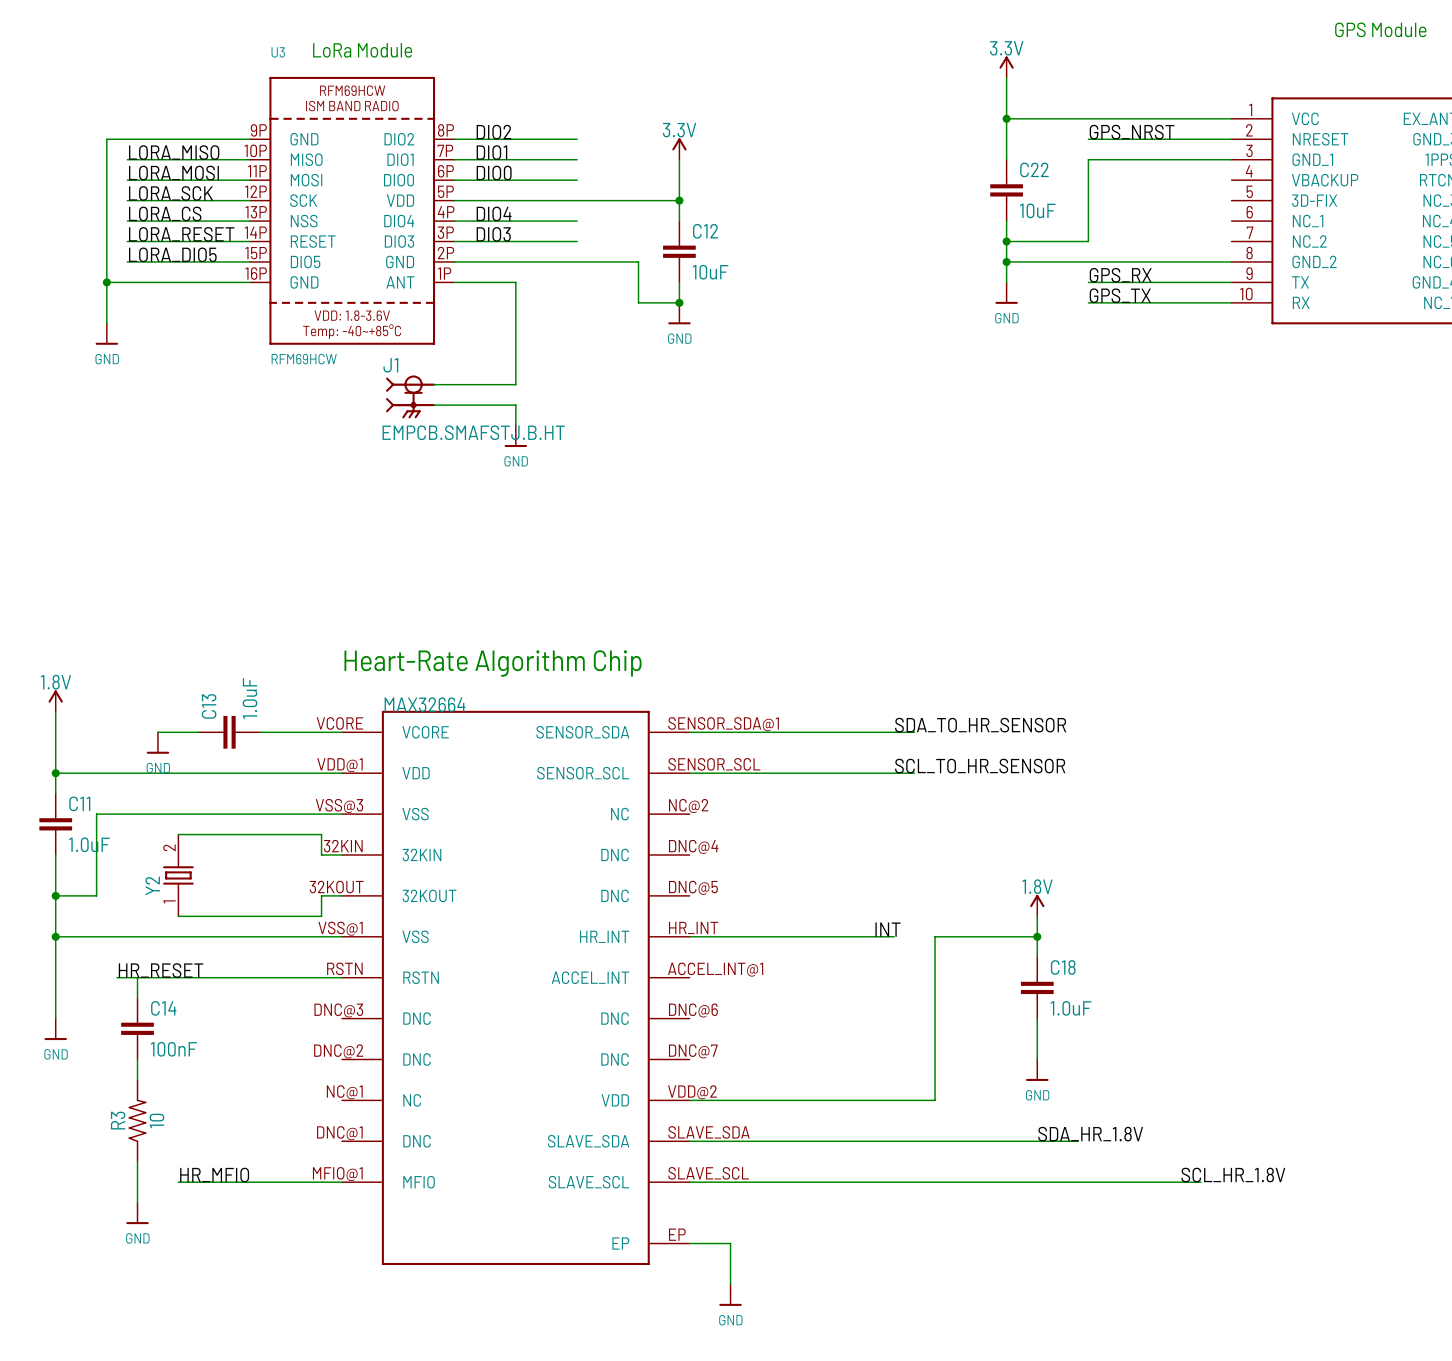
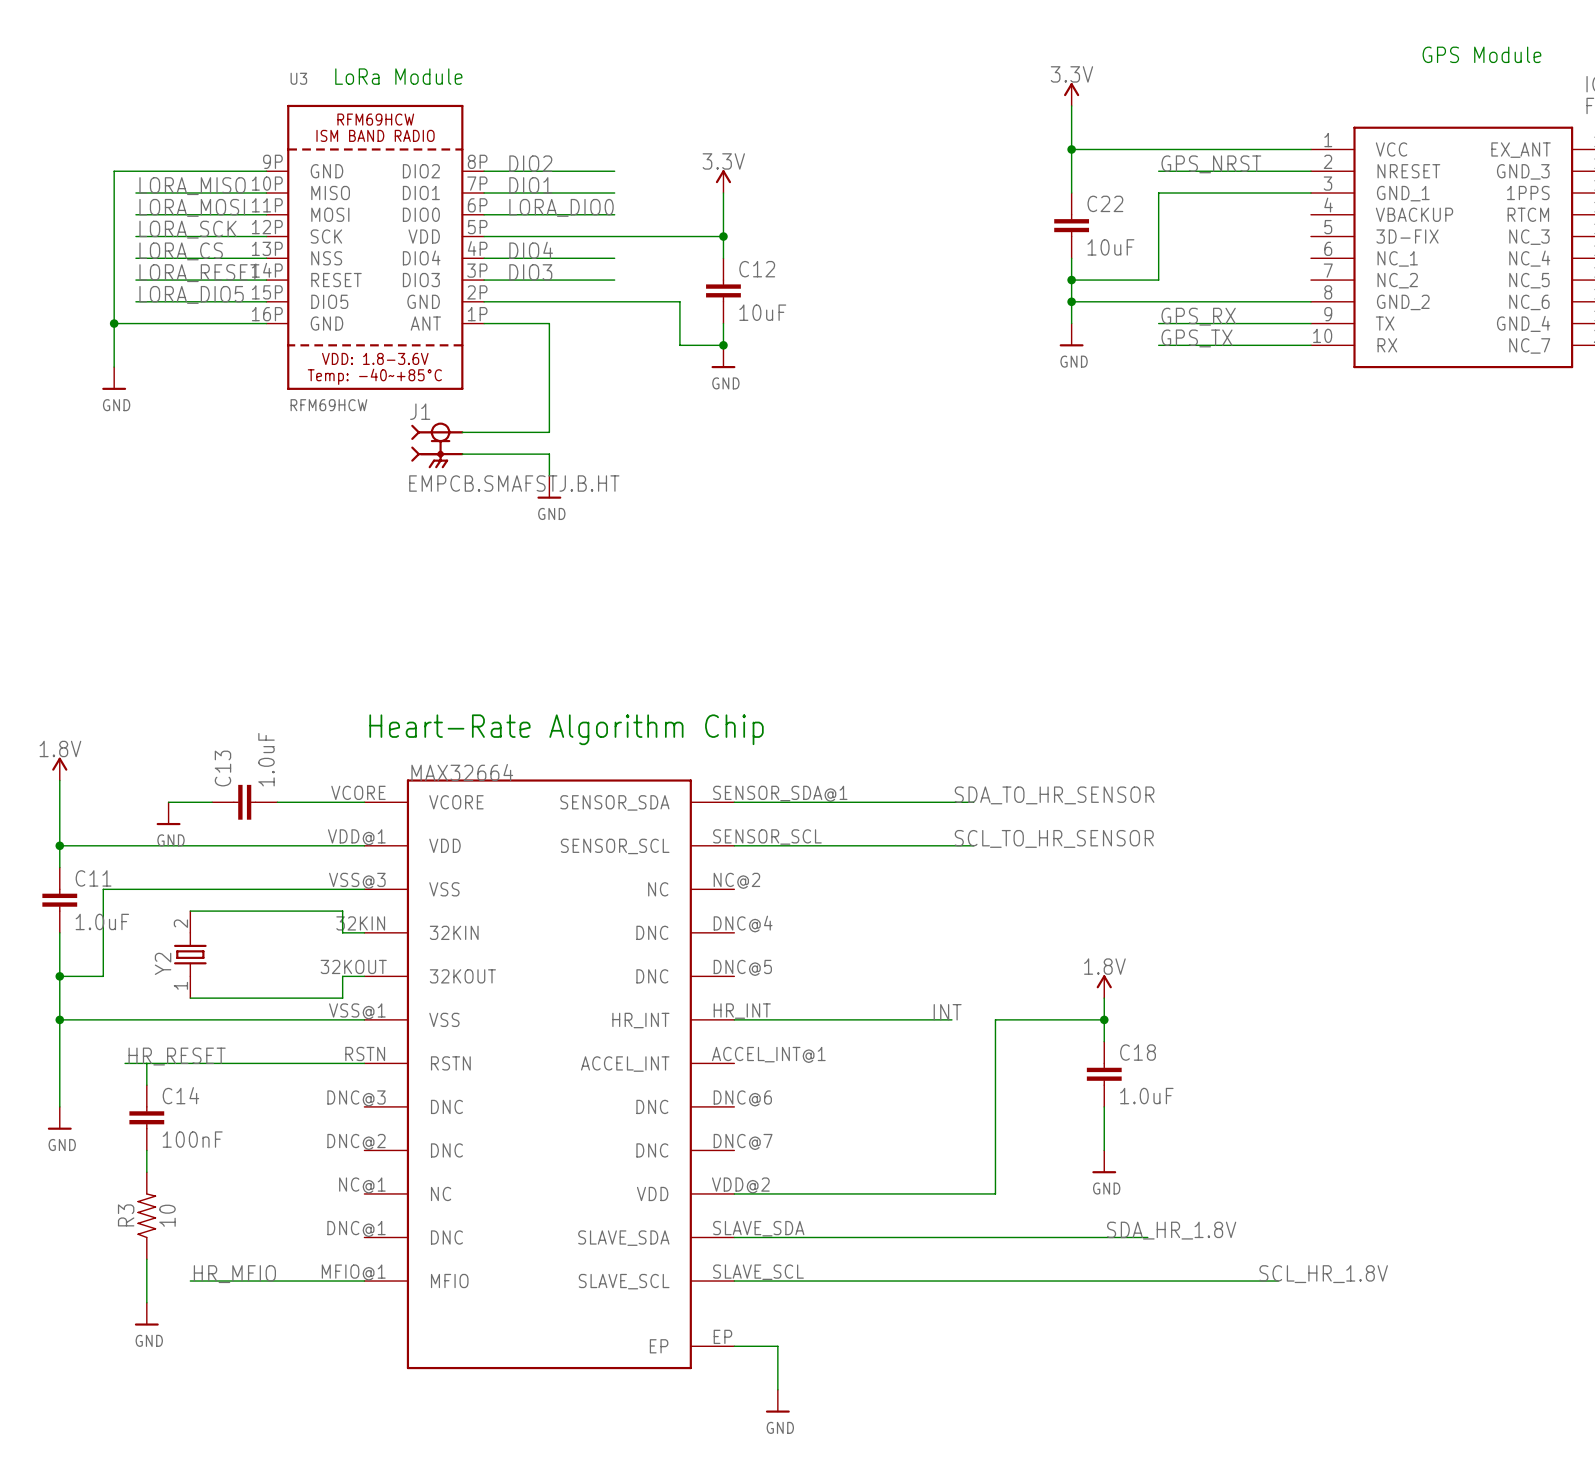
label: DIO0 (494, 173) -> LORA_DIO0 (561, 207)

